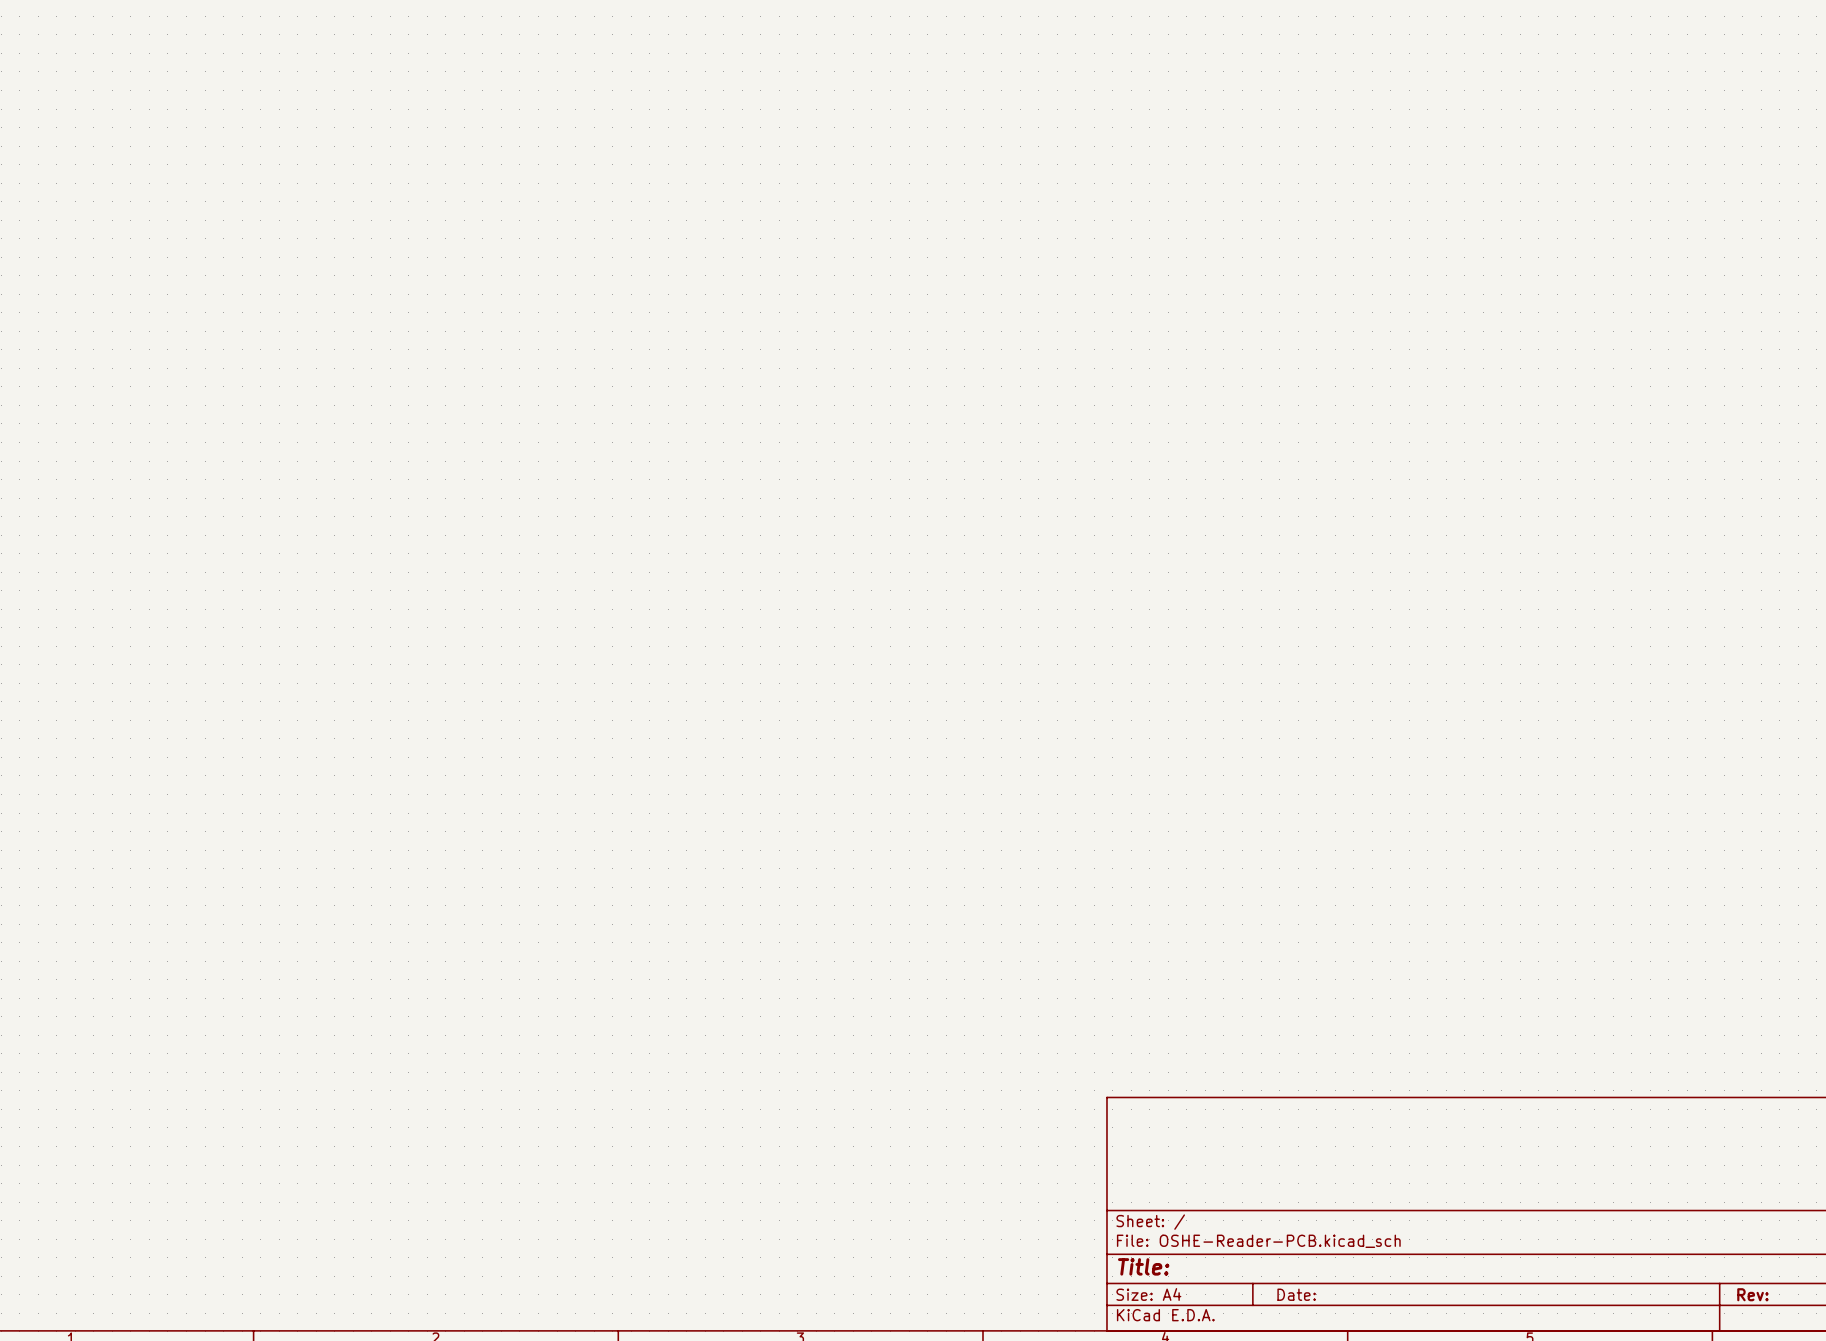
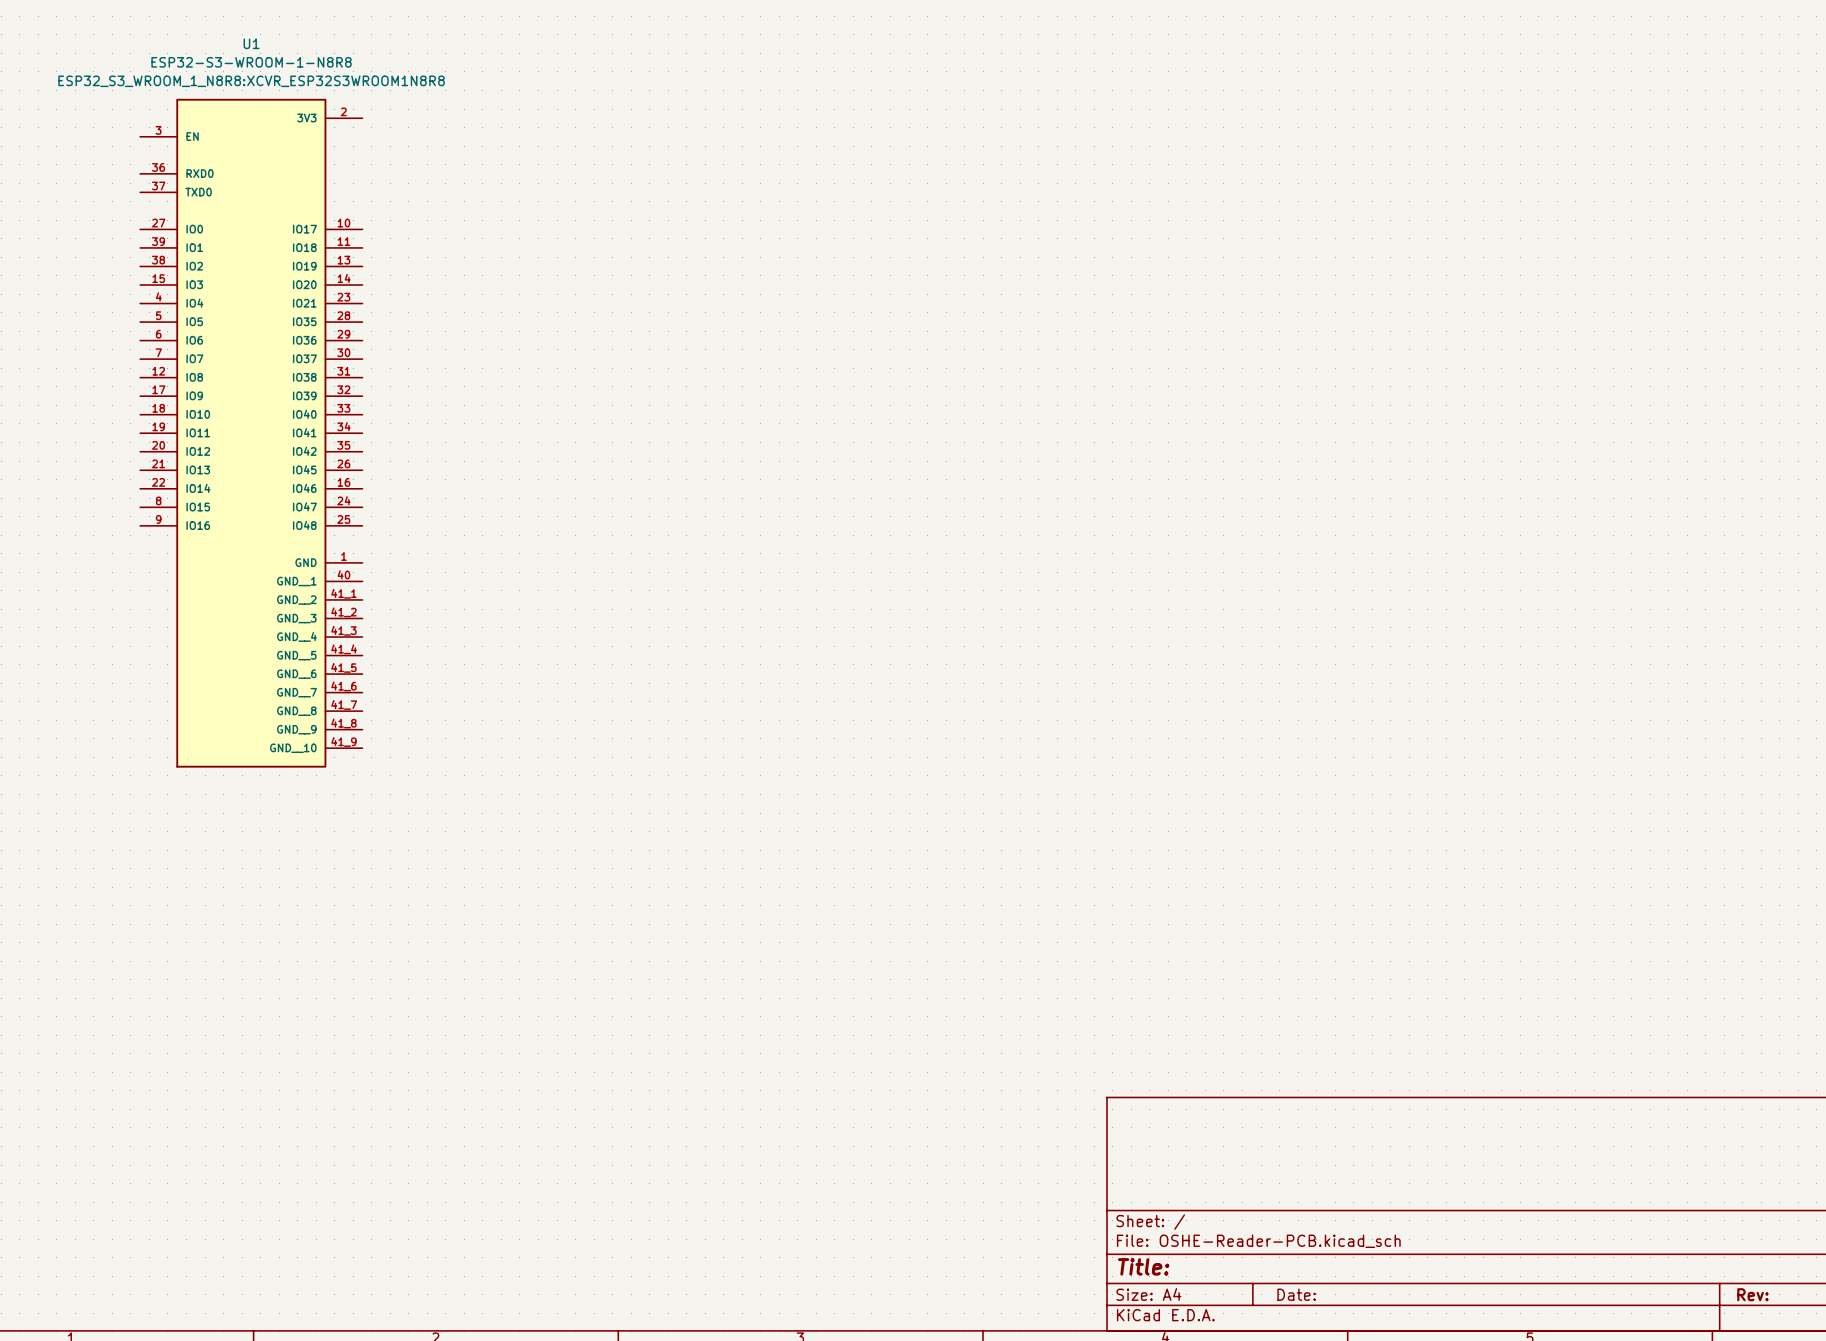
U1: none -> ESP32-S3-WROOM-1-N8R8 (251, 433)

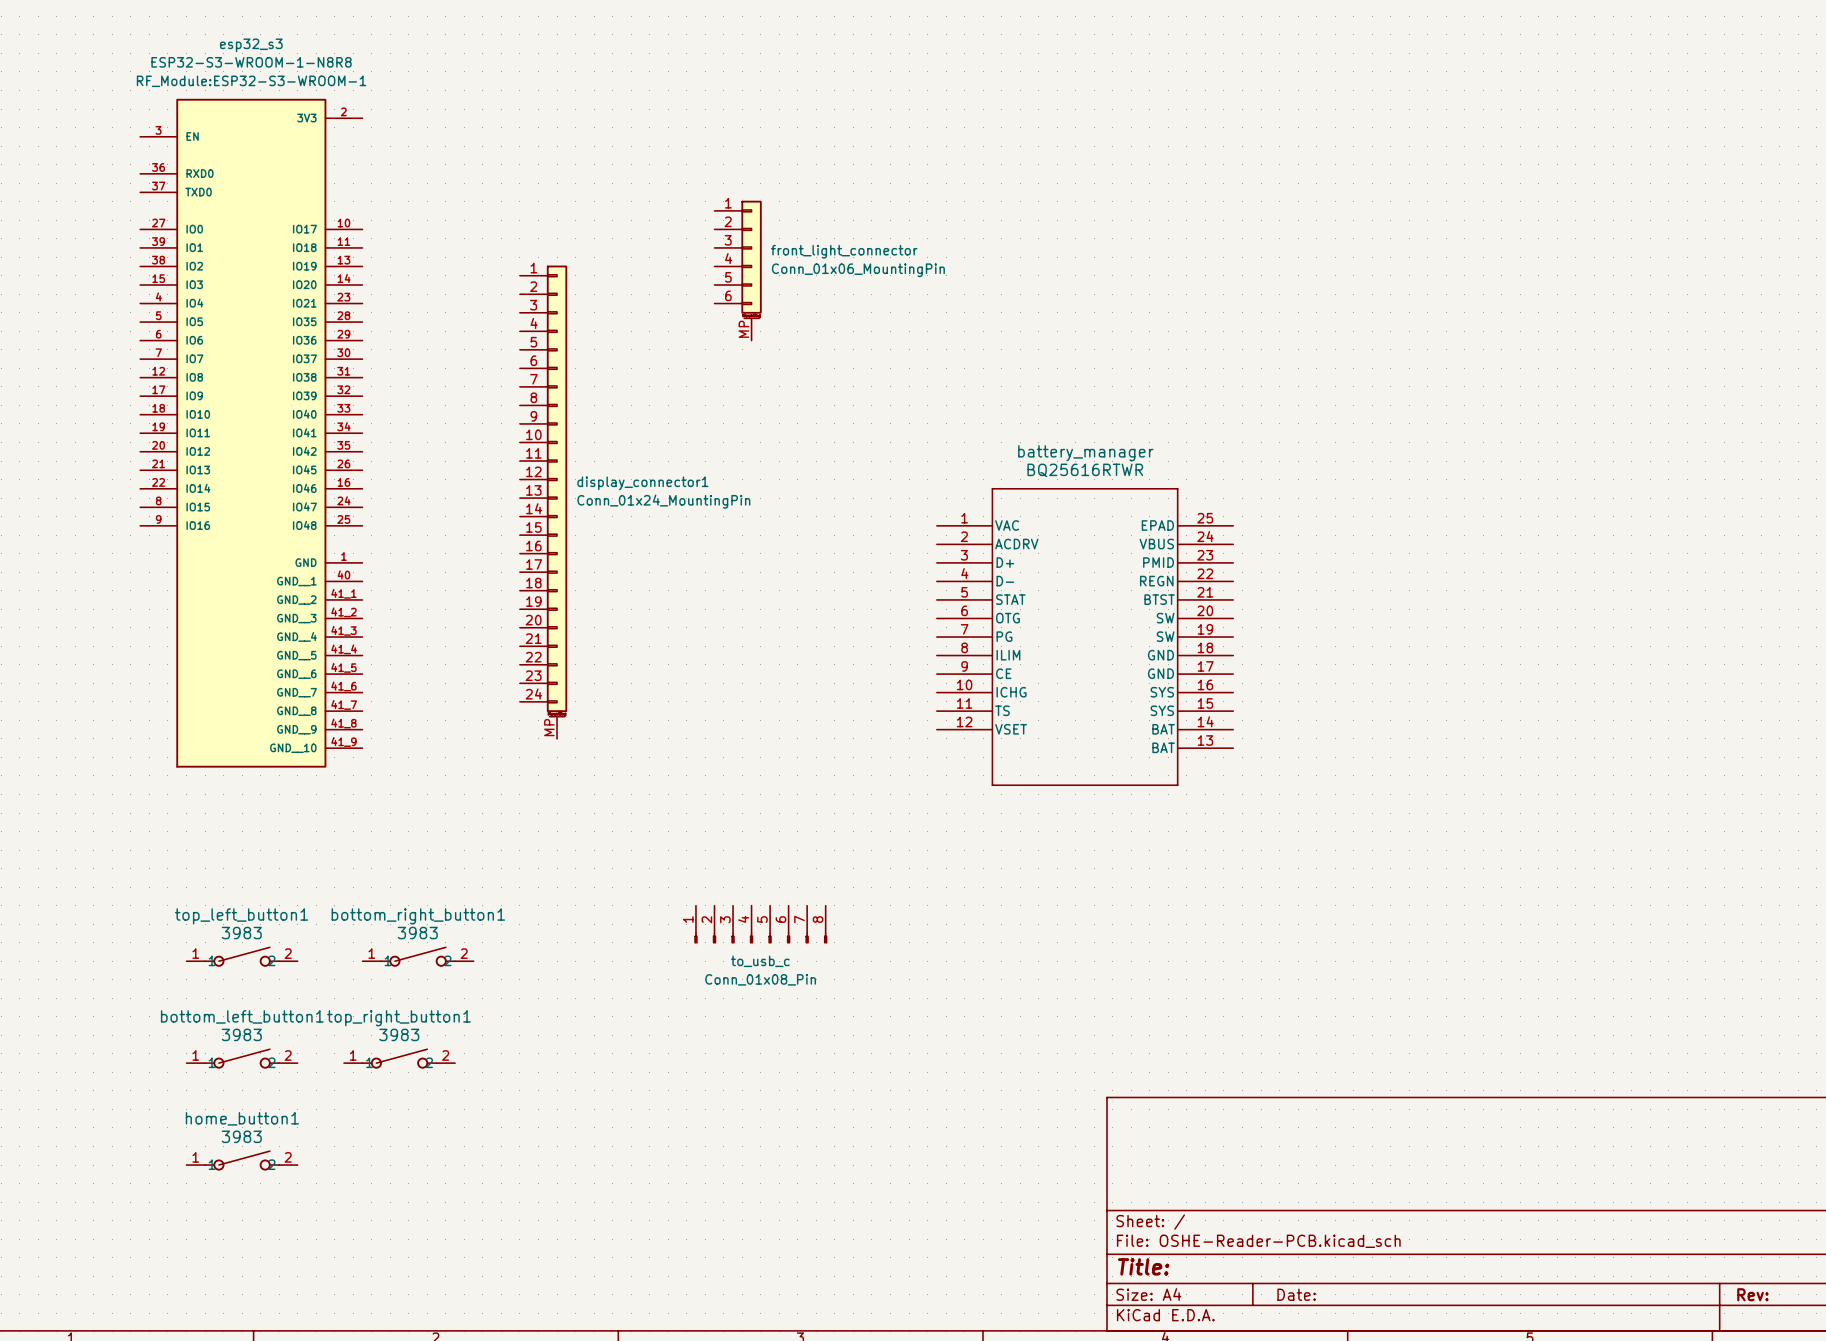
U1 name: U1 (251, 43) -> esp32_s3 (251, 45)
U1 text: ESP32_S3_WROOM_1_N8R8:XCVR_ESP32S3WROOM1N8R8 (251, 81) -> RF_Module:ESP32-S3-WROOM-1 (251, 81)
front_light_connector: none -> Conn_01x06_MountingPin (738, 270)
display_connector1: none -> Conn_01x24_MountingPin (543, 502)
battery_manager: none -> BQ25616RTWR (1085, 637)
to_usb_c: none -> Conn_01x08_Pin (760, 924)
top_left_button1: none -> 3983 (242, 956)
bottom_right_button1: none -> 3983 (418, 956)
bottom_left_button1: none -> 3983 (242, 1058)
top_right_button1: none -> 3983 (399, 1058)
home_button1: none -> 3983 (242, 1160)

